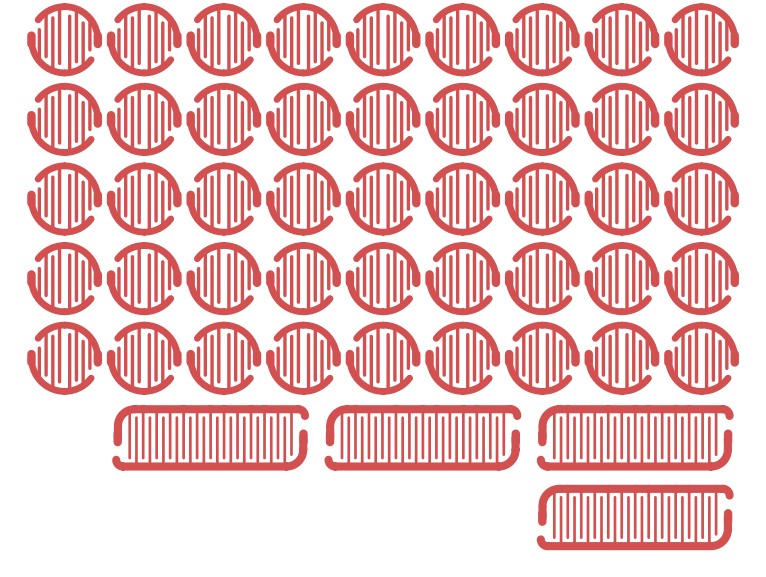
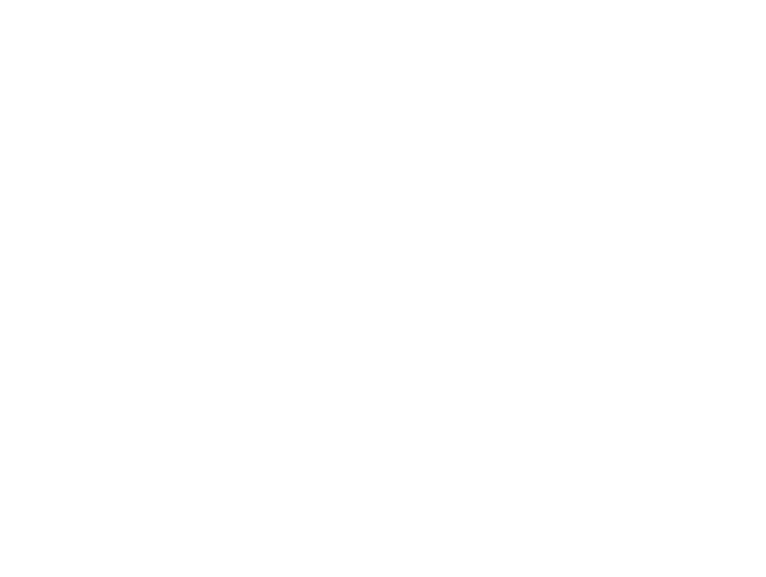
part: (64, 39) -> none
part: (144, 39) -> none
part: (223, 39) -> none
part: (303, 39) -> none
part: (383, 39) -> none
part: (462, 39) -> none
part: (542, 39) -> none
part: (621, 39) -> none
part: (701, 39) -> none
part: (64, 119) -> none
part: (144, 119) -> none
part: (223, 119) -> none
part: (303, 119) -> none
part: (383, 119) -> none
part: (462, 119) -> none
part: (542, 119) -> none
part: (621, 119) -> none
part: (701, 119) -> none
part: (64, 199) -> none
part: (144, 199) -> none
part: (223, 199) -> none
part: (303, 199) -> none
part: (383, 199) -> none
part: (462, 199) -> none
part: (542, 199) -> none
part: (621, 199) -> none
part: (701, 199) -> none
part: (64, 278) -> none
part: (144, 278) -> none
part: (223, 278) -> none
part: (303, 278) -> none
part: (383, 278) -> none
part: (462, 278) -> none
part: (542, 278) -> none
part: (621, 278) -> none
part: (701, 278) -> none
part: (64, 358) -> none
part: (144, 358) -> none
part: (223, 358) -> none
part: (303, 358) -> none
part: (383, 358) -> none
part: (462, 358) -> none
part: (542, 358) -> none
part: (621, 358) -> none
part: (701, 358) -> none
part: (210, 437) -> none
part: (422, 437) -> none
part: (635, 437) -> none
part: (635, 517) -> none

